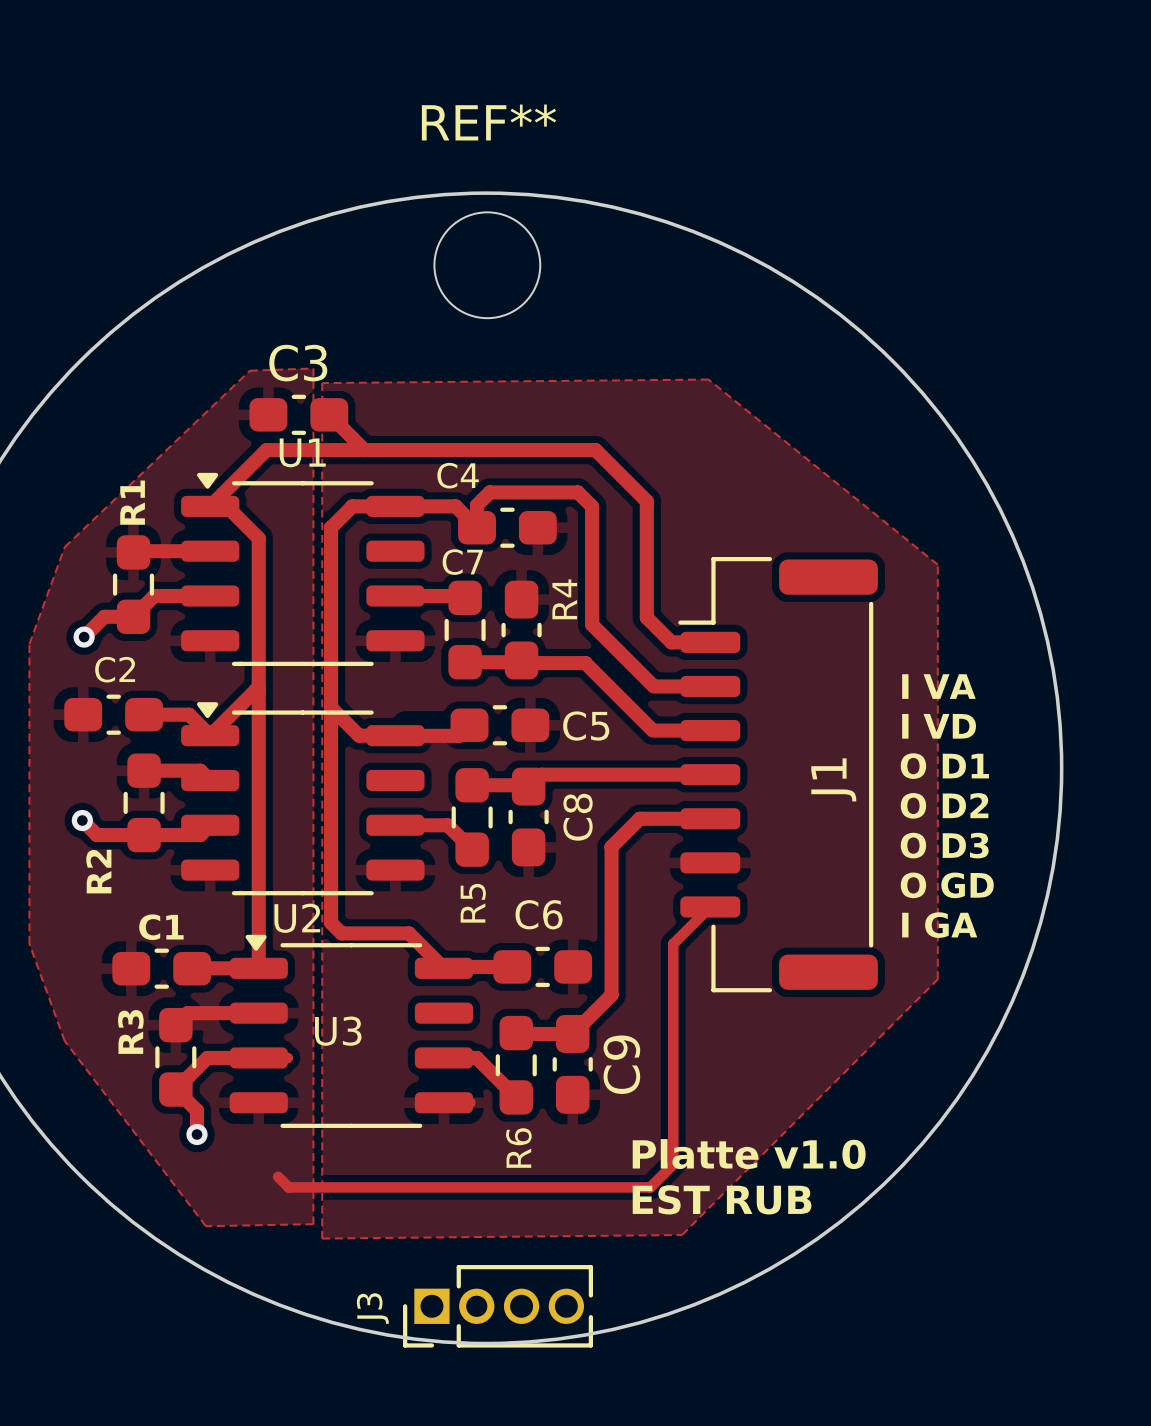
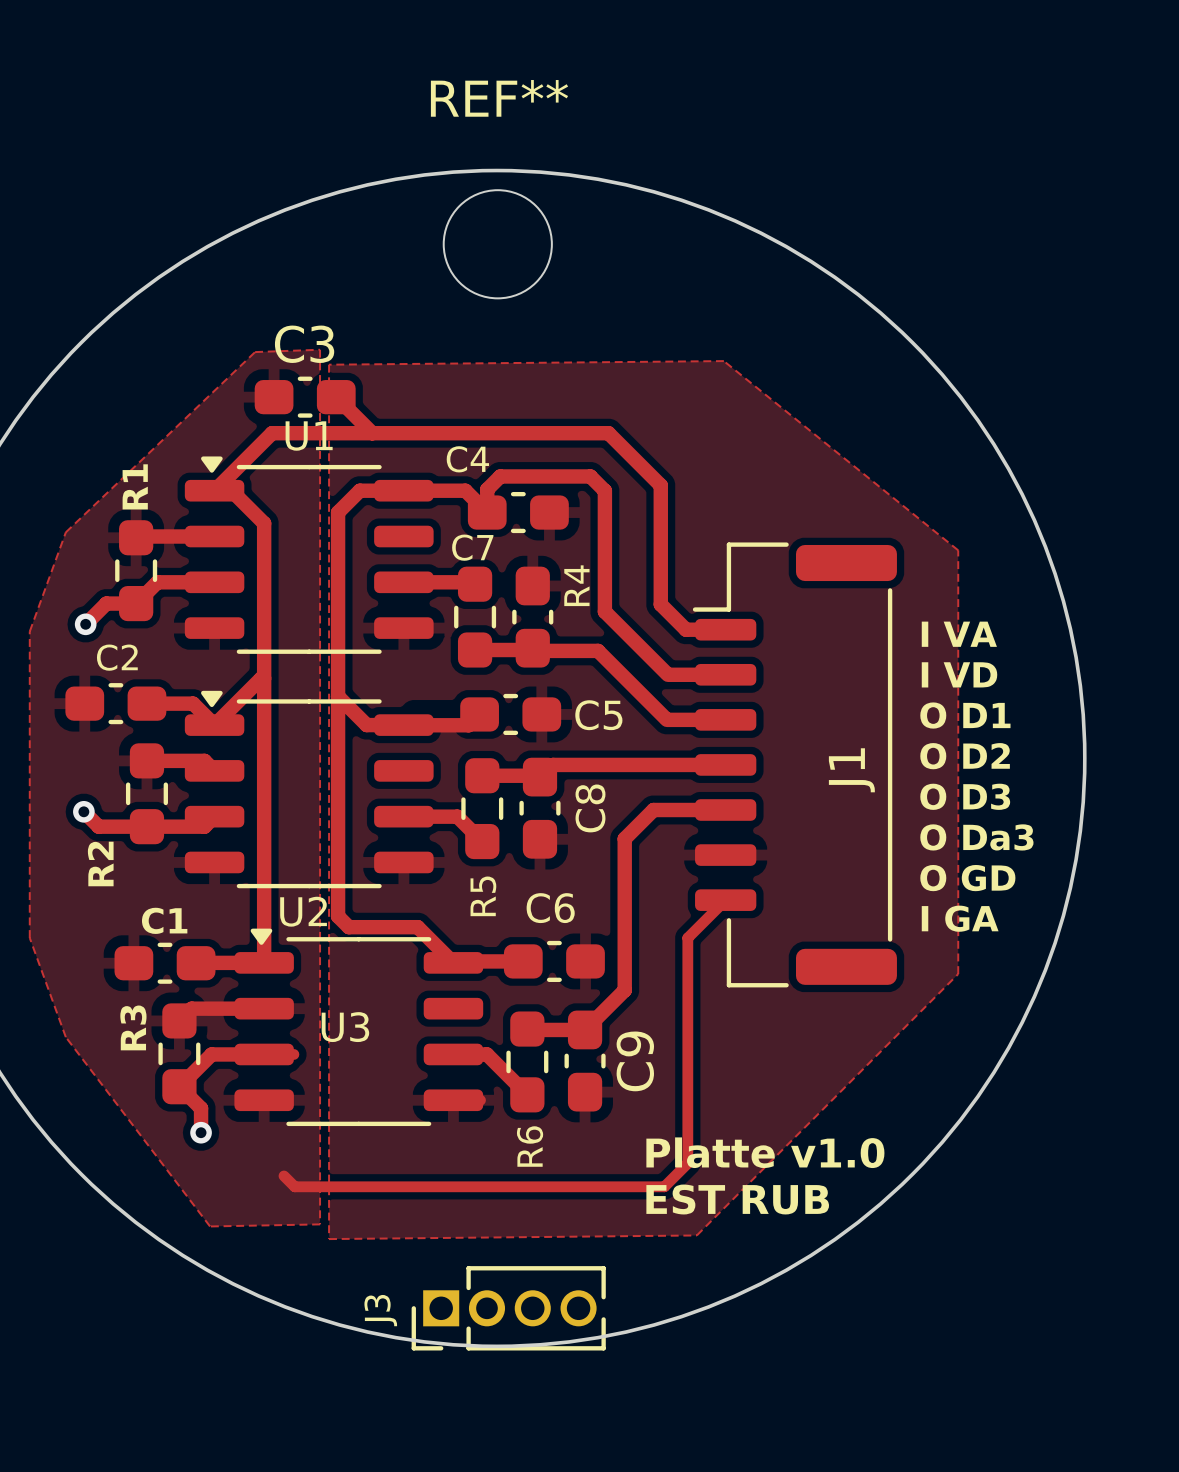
text: none -> I VA (959, 634)
text: I VA (938, 686) -> I VD (959, 674)
text: I VD (939, 726) -> O D1 (965, 715)
text: O D1 (944, 766) -> O D2 (965, 756)
text: O D2 (944, 805) -> O D3 (965, 796)
text: O D3 (944, 845) -> O Da3 (976, 837)

